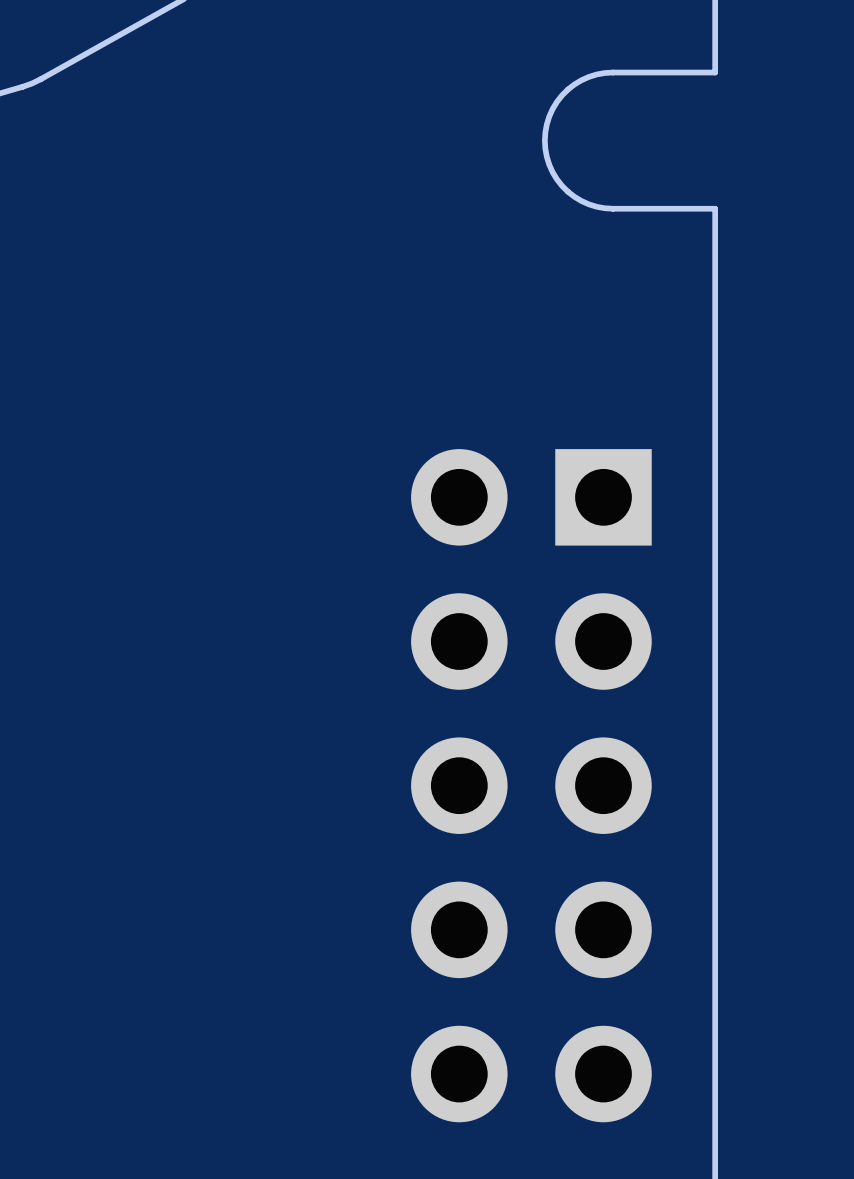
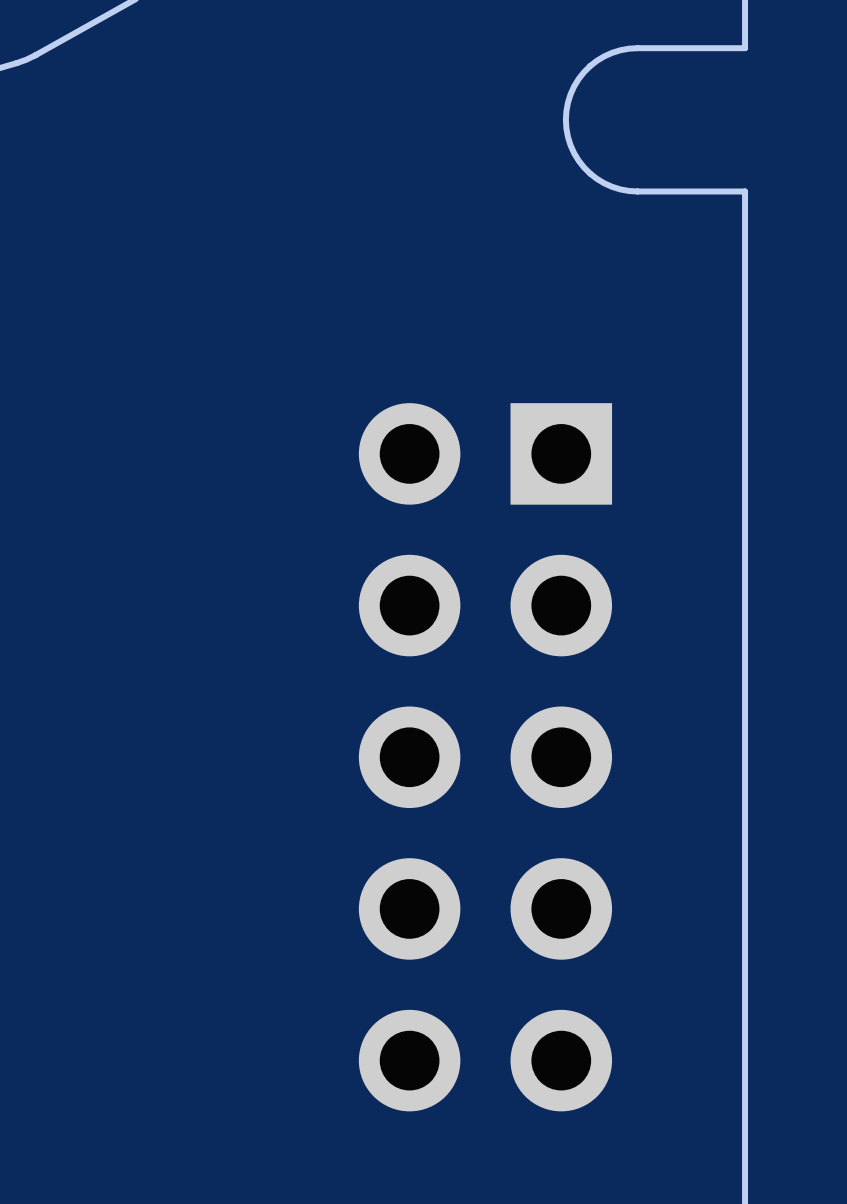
part position: (531, 785) -> (485, 757)

